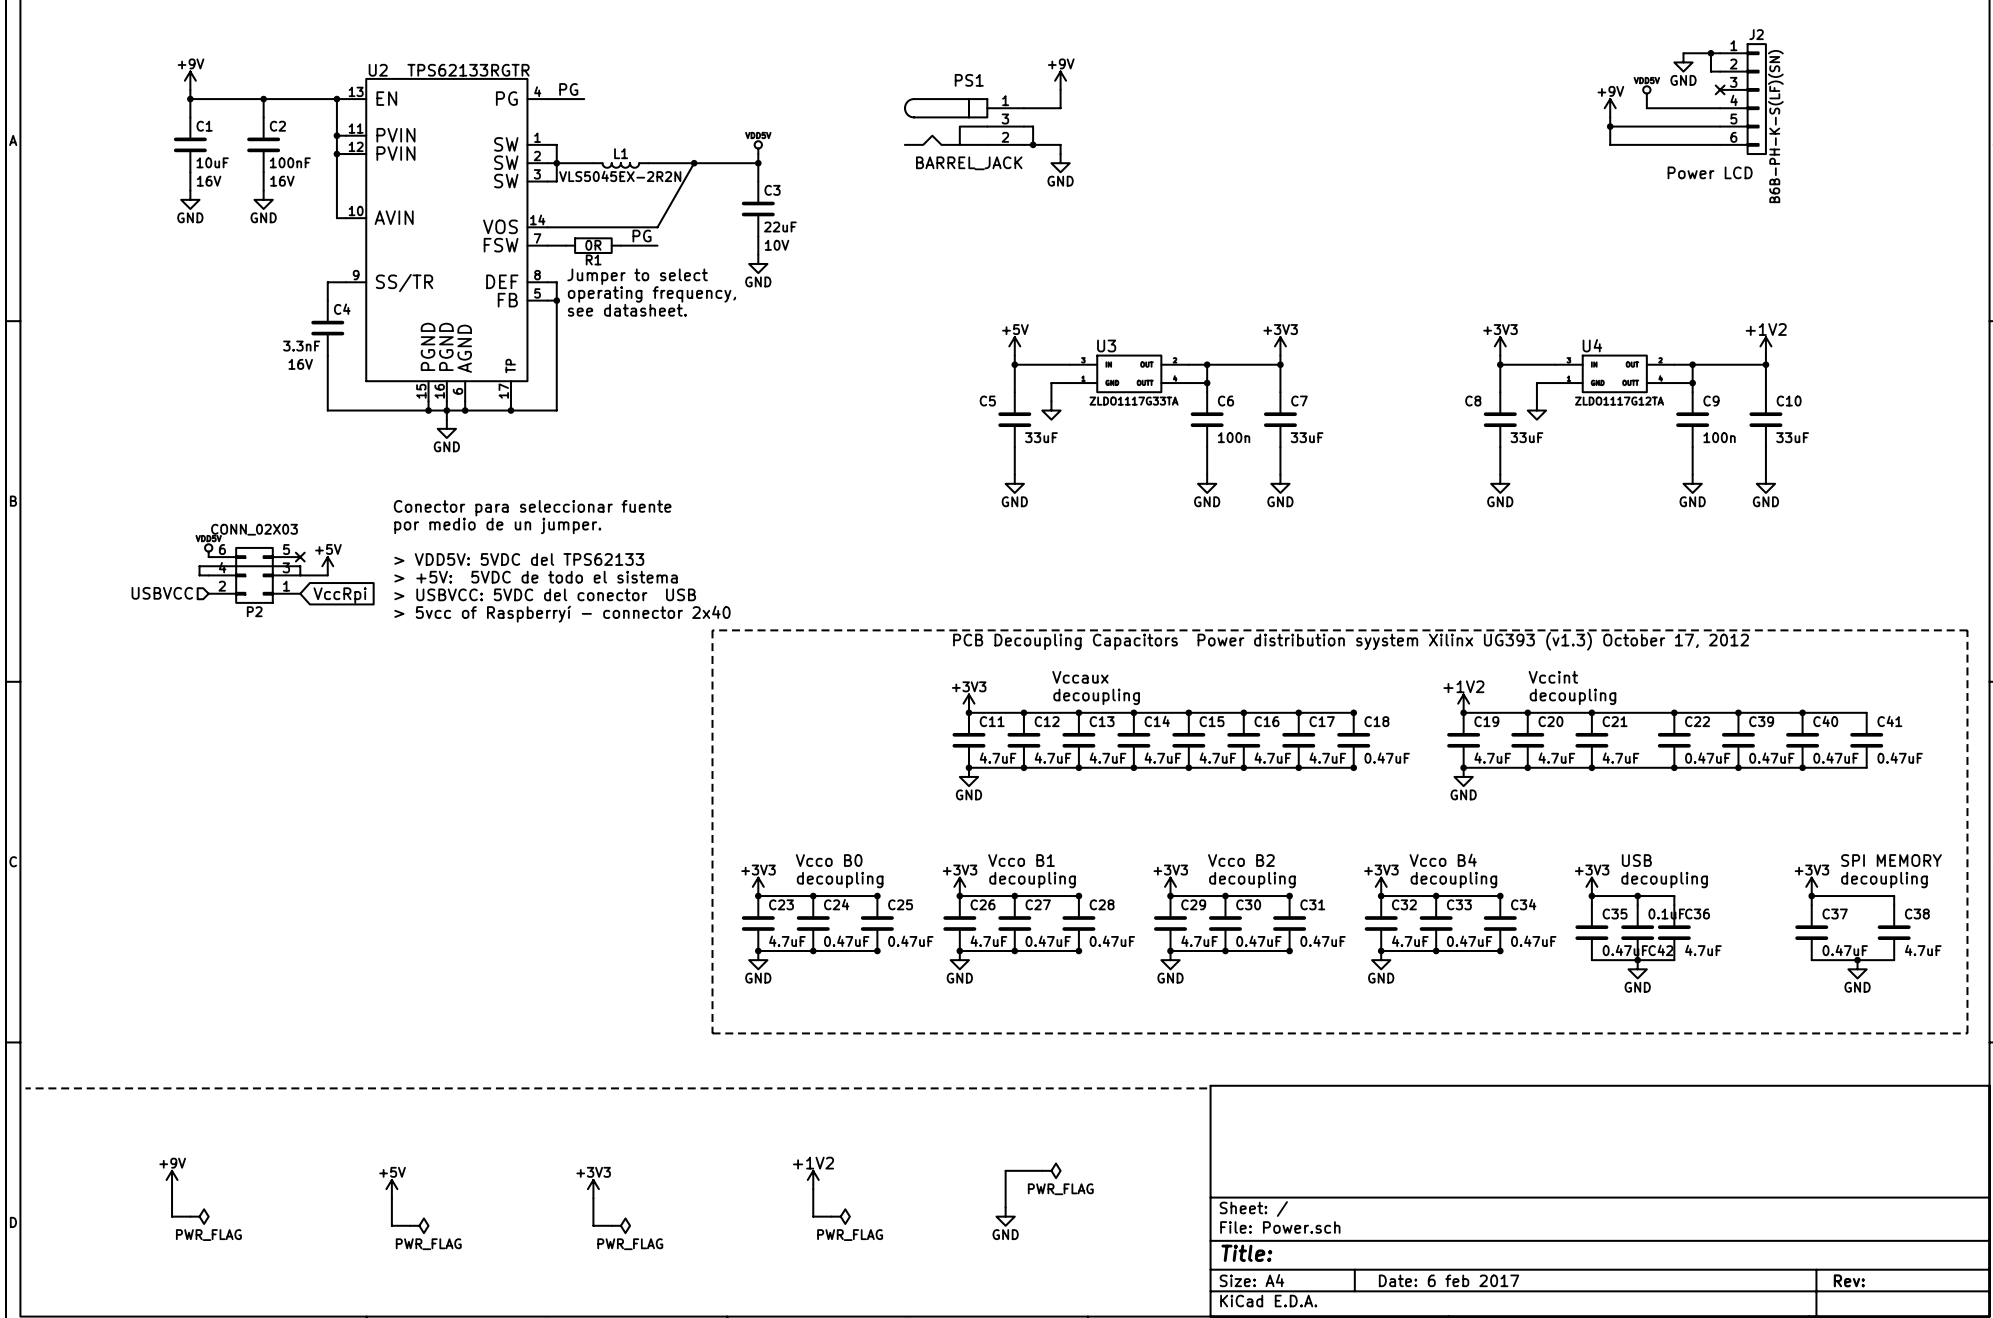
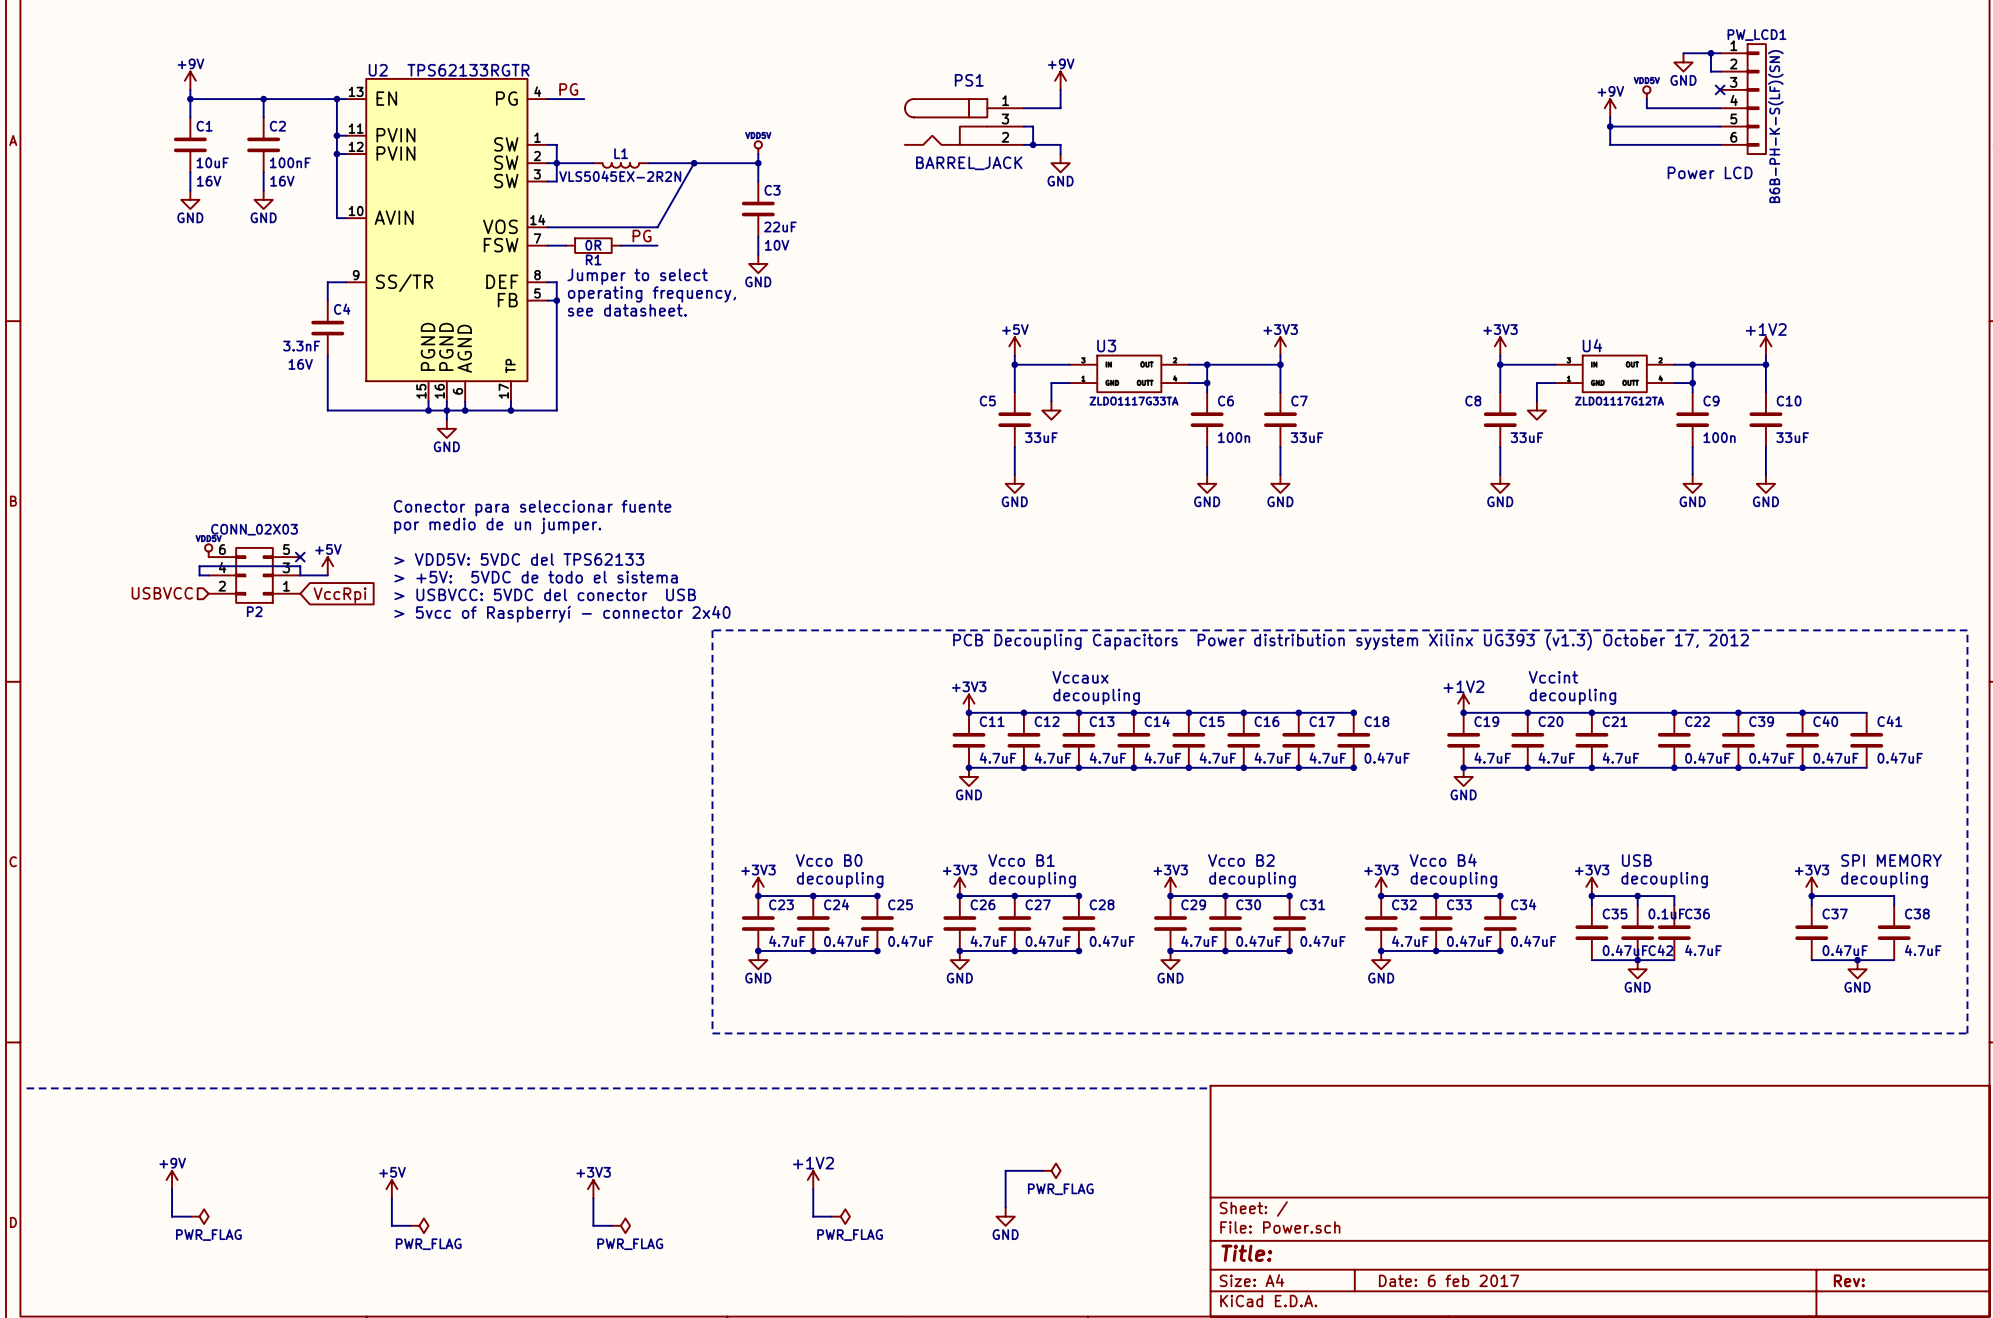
J2 name: J2 (1756, 34) -> PW_LCD1 (1756, 35)

